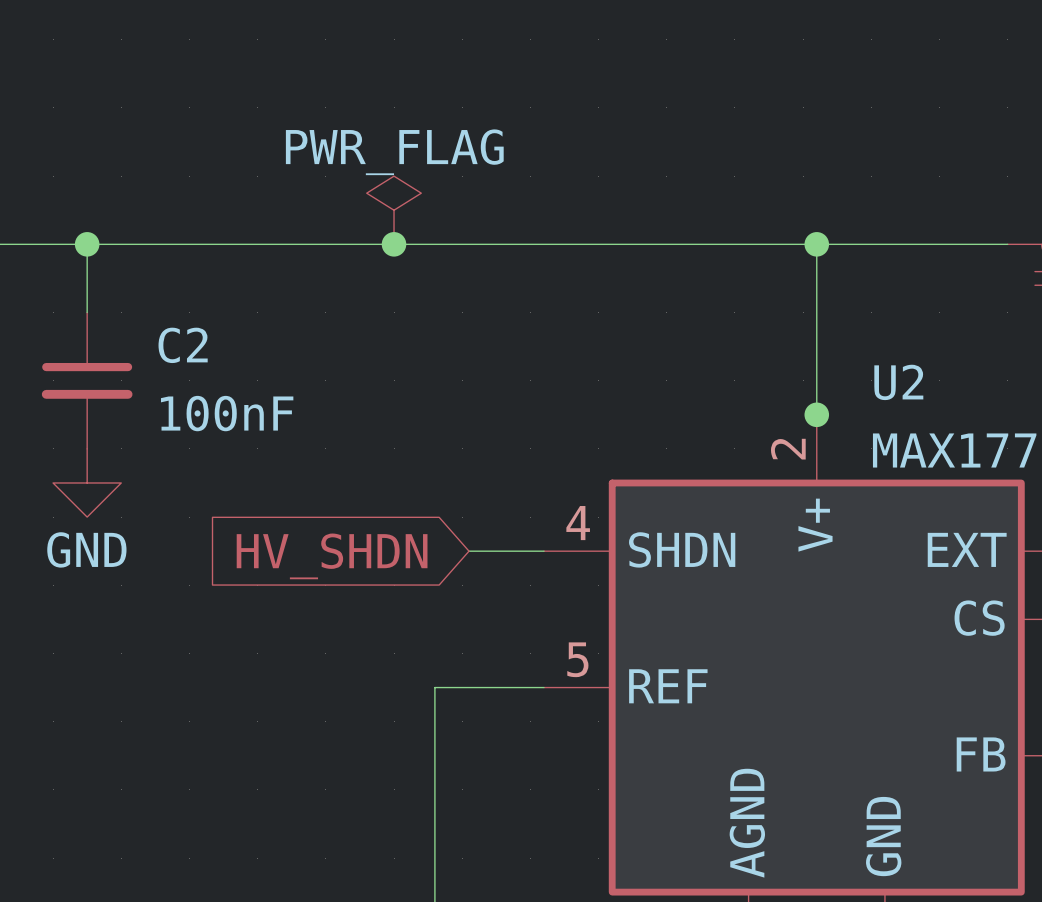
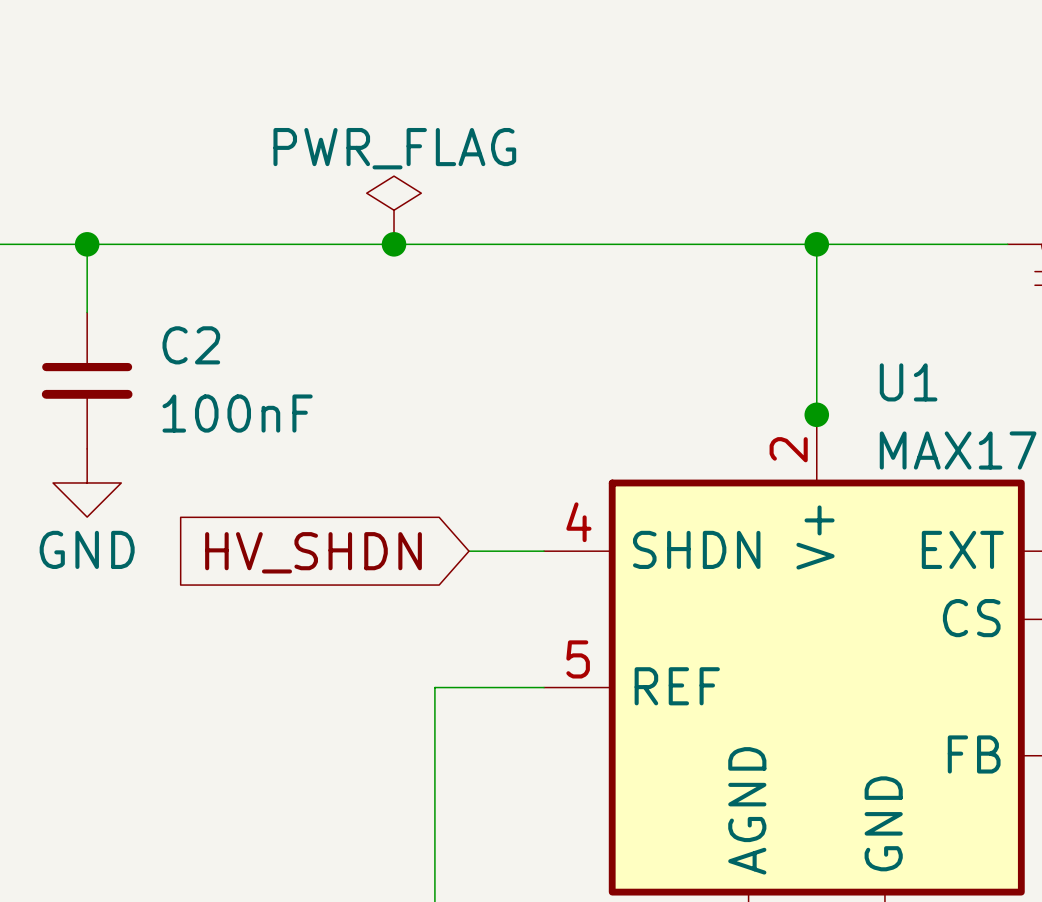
U2 name: U2 (898, 382) -> U1 (908, 382)

